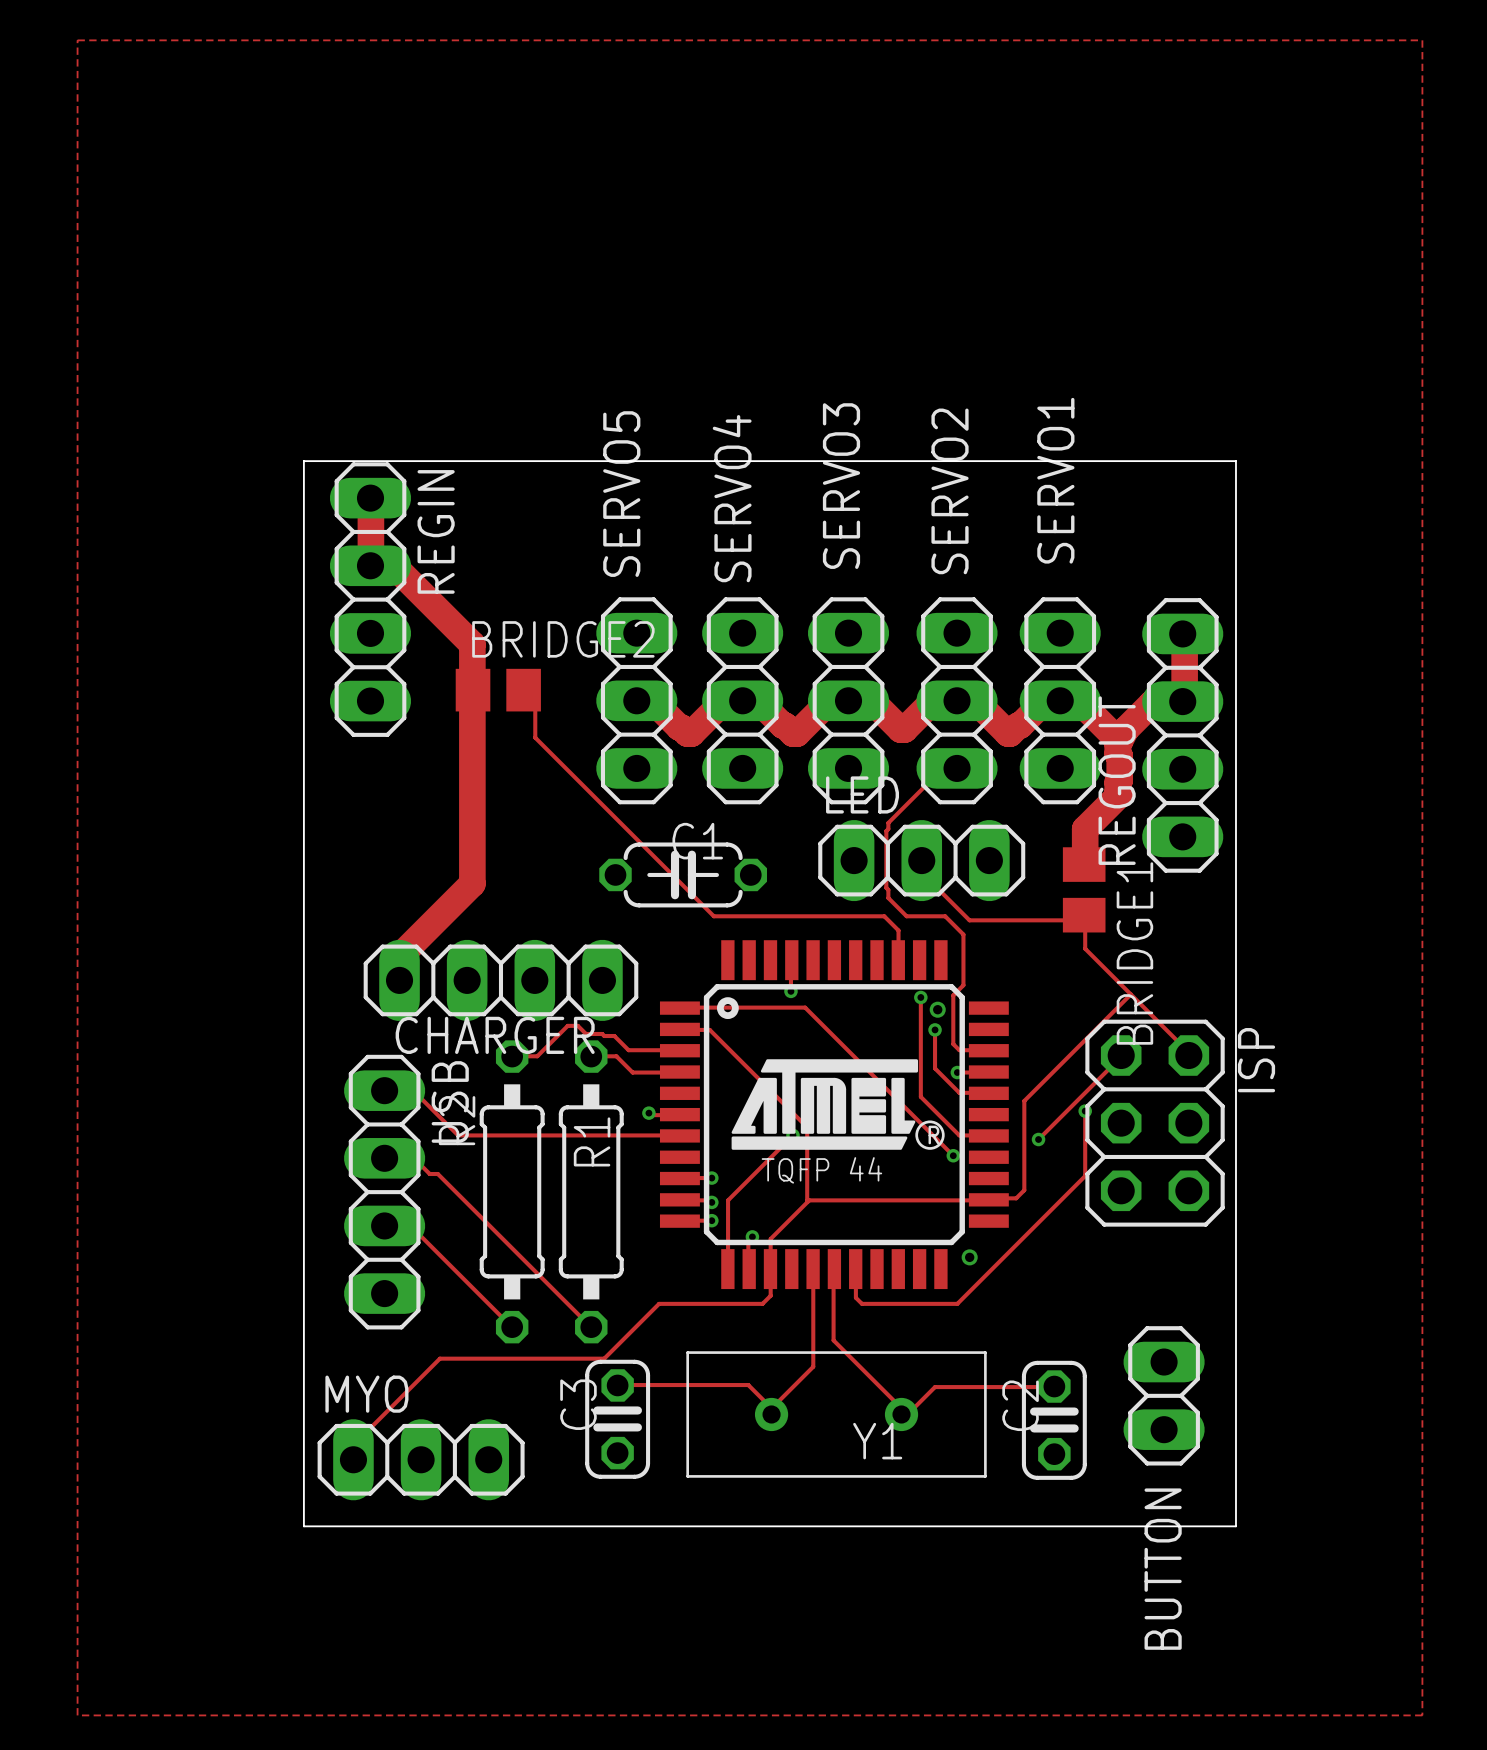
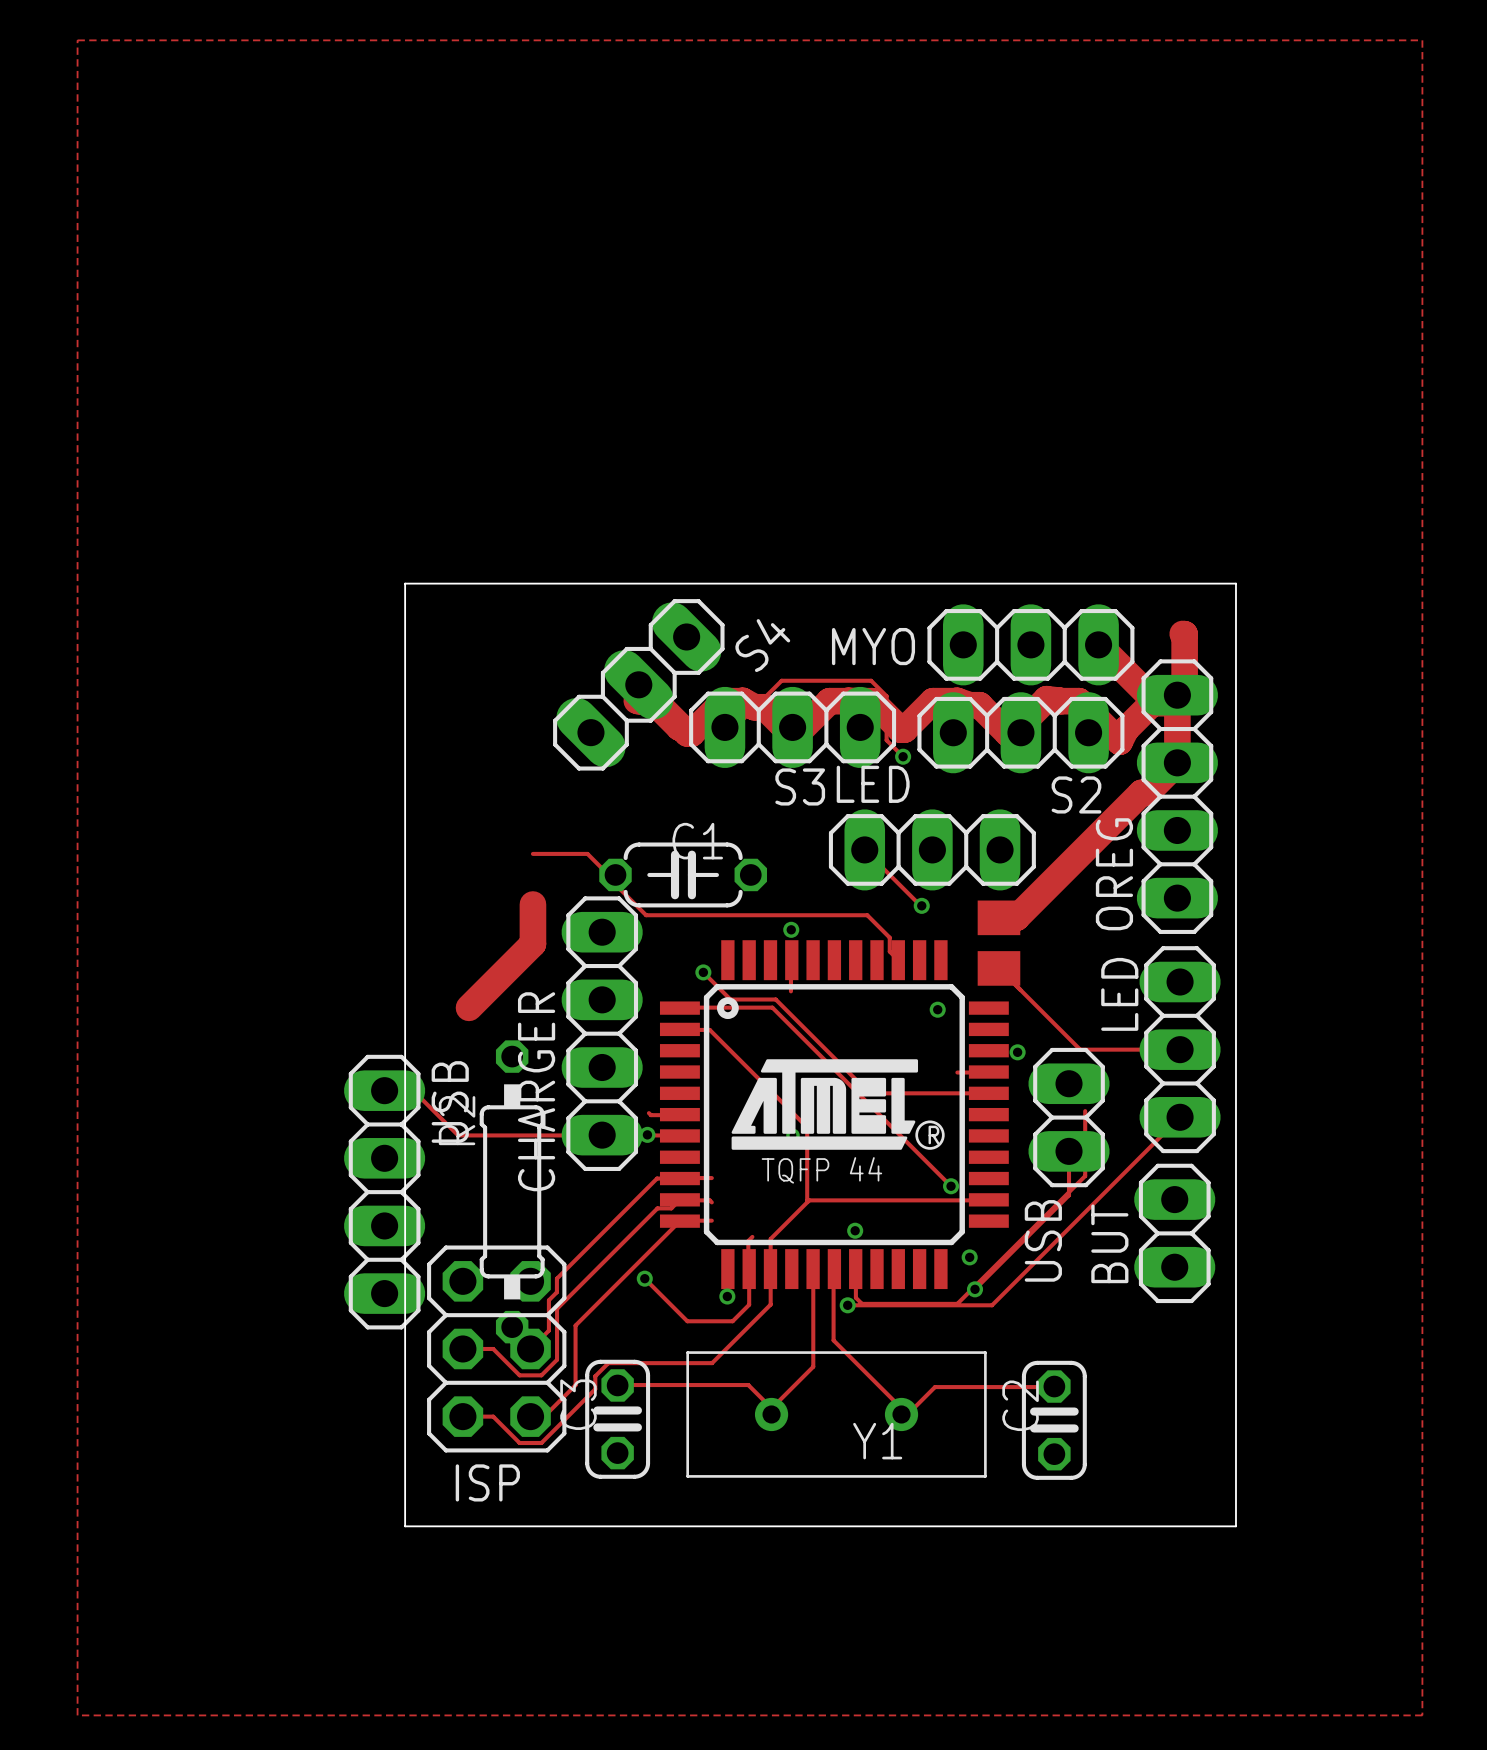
track: (370, 498) (370, 567) (395, 567) (472, 644) (472, 883) (401, 954) (401, 979) (399, 980) -> none
board edge: (1235, 583) (1235, 461) (303, 461) (303, 1526) (405, 1526) -> (1235, 583) (405, 583) (405, 1526)
REGIN: (370, 599) -> none
MYO: none -> (1030, 644)
track: none -> (1098, 644) (1148, 695) (1177, 695) (1177, 762) (1147, 792) (1141, 792) (1016, 917) (999, 916)
S4: none -> (638, 684)
BRIDGE2: (498, 690) -> none
track: (523, 690) (535, 701) (535, 737) (713, 916) (884, 916) (898, 930) (898, 958) -> none
SERVO5: (636, 700) -> none
SERVO4: (742, 700) -> none
SERVO3: (848, 700) -> none
SERVO2: (957, 700) -> none
SERVO1: (1060, 700) -> none
track: none -> (724, 727) (734, 727) (781, 680) (871, 680) (886, 696) (886, 740) (903, 756)
S3: none -> (792, 727)
S2: none -> (1020, 732)
REGOUT: (1182, 735) -> none
track: (1119, 741) (1117, 743) (1117, 753) (1119, 755) (1117, 792) (1119, 794) (1085, 829) (1084, 864) -> none
via: none -> (903, 756)
track: (957, 768) (955, 770) (941, 770) (888, 822) (886, 831) (886, 887) (888, 889) (888, 898) (906, 916) (945, 916) (963, 934) (963, 985) (953, 995) (953, 1044) (959, 1050) (987, 1050) -> none
OREG: none -> (1177, 796)
track: none -> (864, 849) (921, 905)
track: none -> (532, 853) (587, 853) (646, 915) (867, 915) (889, 937) (889, 951) (898, 960)
track: (921, 860) (922, 873) (969, 920) (1085, 920) (1084, 915) (1085, 916) (1085, 948) (1190, 1054) (1188, 1055) -> none
LED position: (921, 860) -> (932, 849)
BRIDGE1: (1084, 889) -> none
track: none -> (532, 904) (532, 943) (469, 1007)
via: none -> (921, 905)
via: none -> (791, 929)
part: none -> (998, 943)
track: none -> (998, 968) (1080, 1049) (1180, 1049)
track: none -> (703, 972) (730, 999) (775, 999) (869, 1093) (988, 1093)
via: none -> (703, 972)
CHARGER rotation: 0° (500, 980) -> 90° clockwise (602, 1033)
via: (790, 991) -> none
track: (1130, 994) (1024, 1100) (1024, 1190) (1016, 1198) (989, 1198) -> none
track: (920, 997) (920, 1096) (959, 1135) (987, 1135) -> none
via: (920, 997) -> none
track: (772, 1007) (805, 1007) (953, 1155) -> (772, 1007) (951, 1186)
track: (935, 1029) (935, 1068) (959, 1092) (987, 1092) -> none
via: (935, 1029) -> none
LED: none -> (1180, 1049)
track: (679, 1050) (628, 1050) (614, 1036) (586, 1033) (577, 1025) (567, 1025) (537, 1056) (512, 1056) -> none
via: none -> (1017, 1052)
track: (1121, 1055) (1038, 1139) -> none
track: (591, 1056) (616, 1056) (632, 1072) (679, 1072) -> none
via: (957, 1072) -> none
via: (1085, 1111) -> none
via: (648, 1113) -> none
USB: none -> (1069, 1117)
track: none -> (1180, 1117) (992, 1305) (847, 1305)
ISP: (1155, 1123) -> none
via: none -> (647, 1134)
track: (792, 1135) (728, 1200) (728, 1267) -> none
via: (1038, 1139) -> none
track: none -> (1069, 1151) (1069, 1195) (975, 1289)
via: (953, 1155) -> none
track: (384, 1158) (415, 1159) (429, 1174) (437, 1174) (591, 1327) -> none
track: none -> (679, 1178) (657, 1178) (556, 1278) (556, 1292) (548, 1300) (548, 1330) (530, 1348)
via: (711, 1178) -> none
via: none -> (951, 1186)
R1: (591, 1191) -> none
track: none -> (679, 1199) (671, 1208) (657, 1208) (557, 1308) (557, 1359) (541, 1375) (519, 1375) (493, 1348) (462, 1348)
via: (711, 1202) -> none
via: (711, 1220) -> none
track: none -> (679, 1221) (575, 1325) (575, 1385) (544, 1416) (530, 1416)
track: (384, 1225) (411, 1226) (512, 1327) -> none
via: none -> (855, 1230)
BUT: none -> (1174, 1233)
via: (752, 1236) -> none
track: none -> (749, 1269) (749, 1304) (732, 1321) (687, 1321) (644, 1278)
via: none -> (644, 1278)
via: none -> (975, 1289)
track: (770, 1295) (762, 1303) (659, 1303) (604, 1358) (439, 1358) (354, 1443) (353, 1459) -> (770, 1295) (770, 1304) (712, 1363) (608, 1363) (595, 1376) (595, 1389) (541, 1443) (519, 1443) (493, 1416) (462, 1416)
via: none -> (727, 1296)
via: none -> (847, 1305)
ISP: none -> (496, 1348)
BUTTON: (1164, 1395) -> none
MYO: (421, 1459) -> none

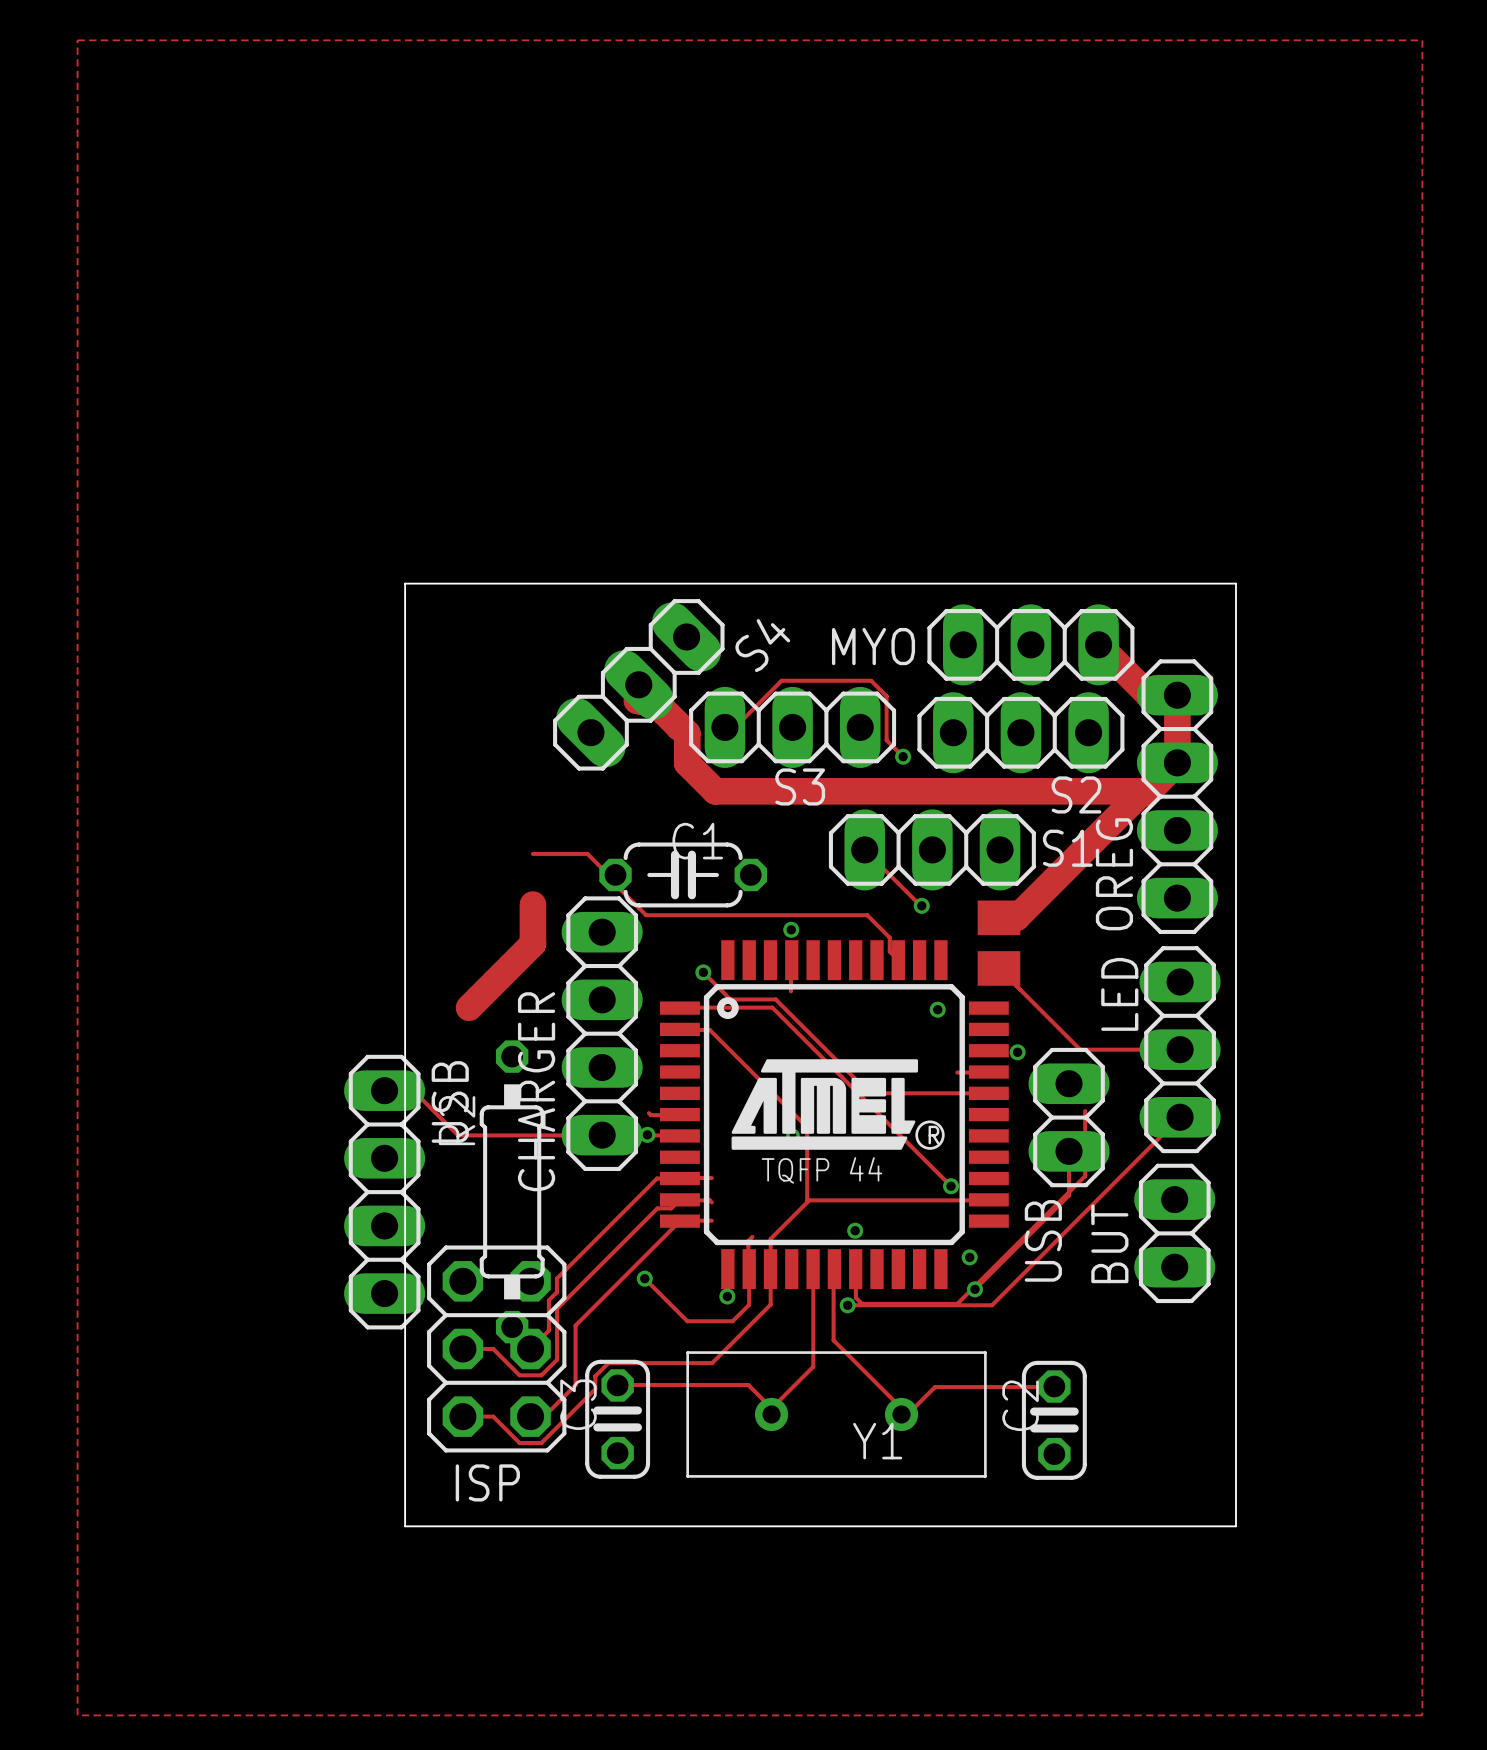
track: (1182, 633) (1184, 634) (1184, 701) (1152, 703) (1125, 729) (1119, 741) (1079, 701) (1046, 699) (1010, 733) (979, 705) (969, 705) (957, 700) (933, 701) (904, 729) (900, 729) (872, 701) (829, 701) (797, 733) (792, 733) (782, 725) (764, 707) (754, 707) (742, 700) (724, 701) (691, 733) (687, 733) -> (1148, 791) (715, 791) (687, 763) (687, 733)
LED name: LED (873, 784) -> S1 (1067, 848)

